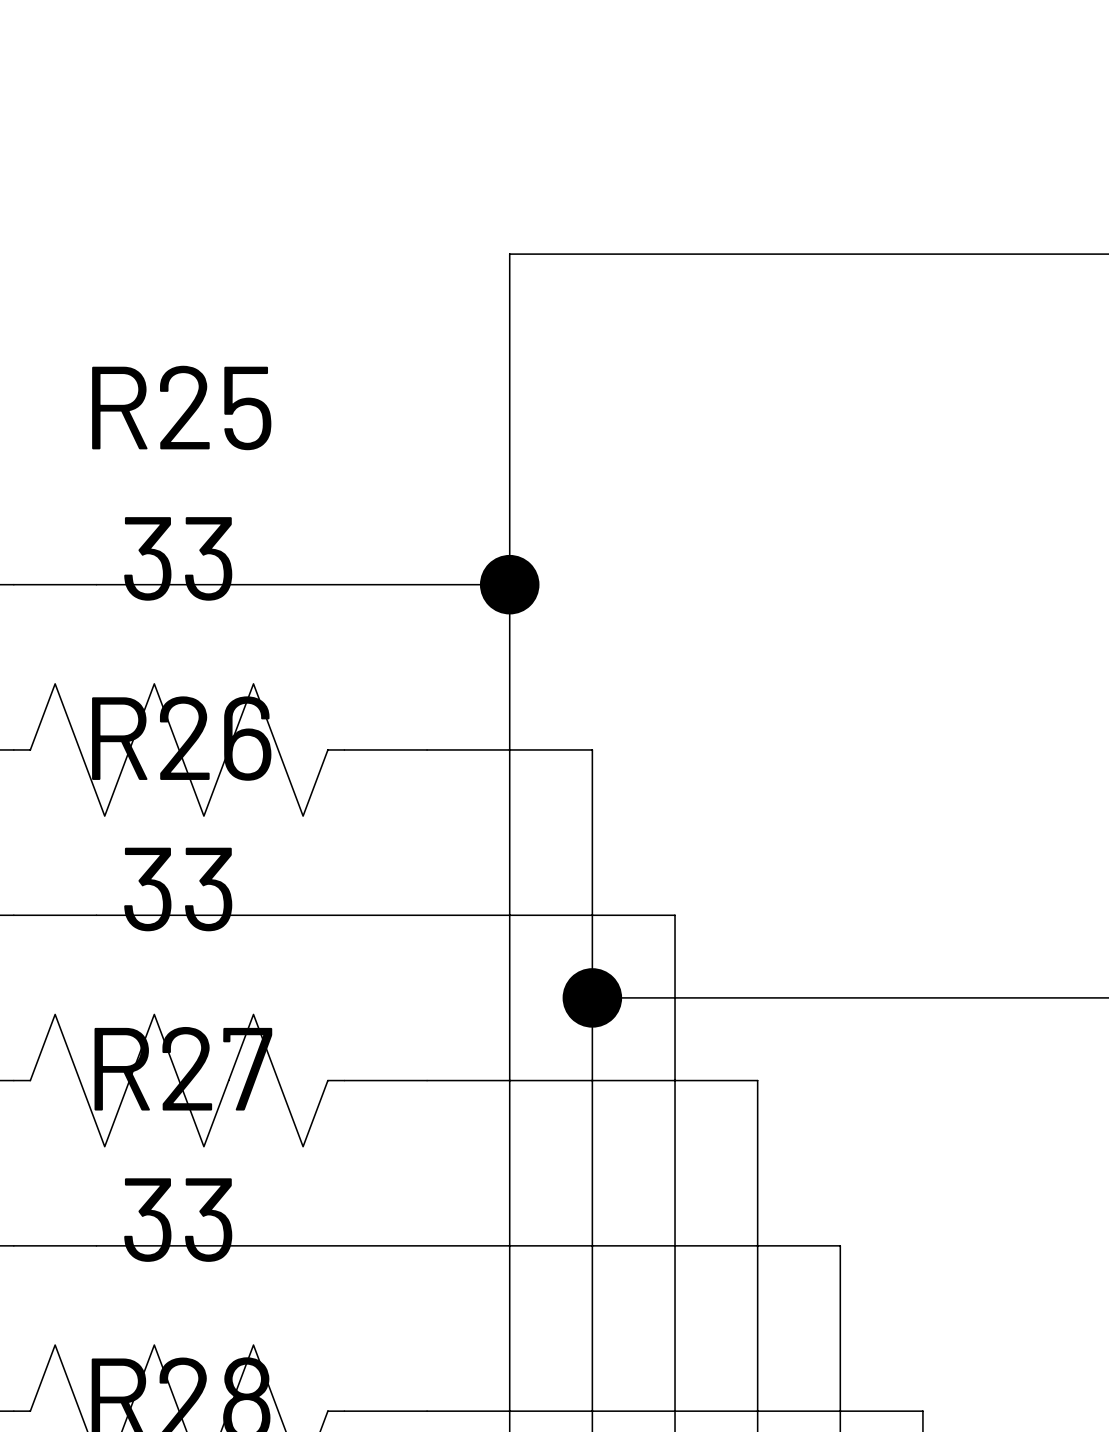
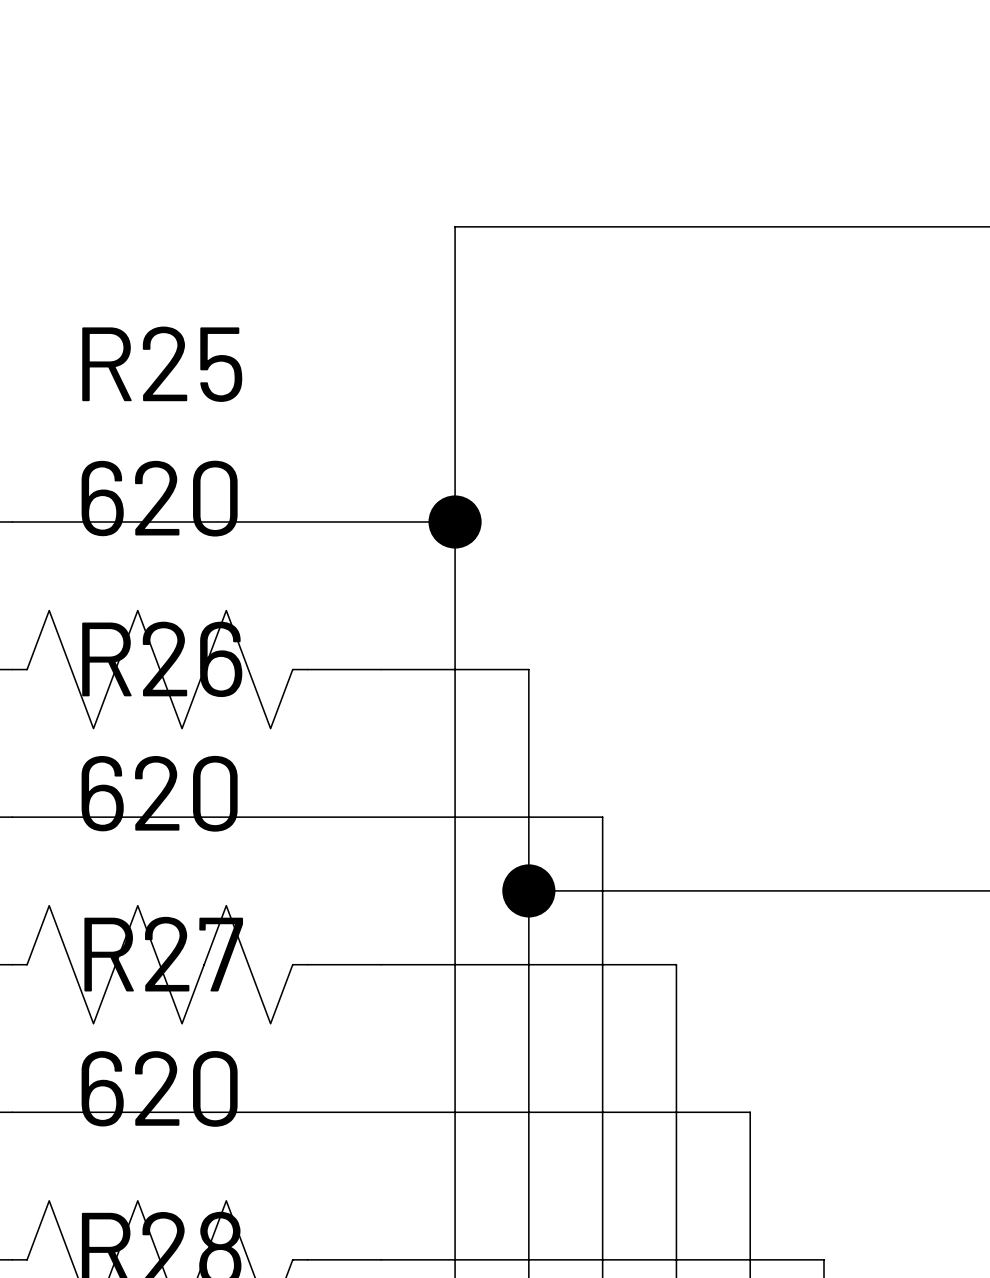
R25 value: 33 (178, 558) -> 620 (159, 498)
R26 value: 33 (178, 889) -> 620 (159, 793)
R27 value: 33 (178, 1220) -> 620 (159, 1088)

